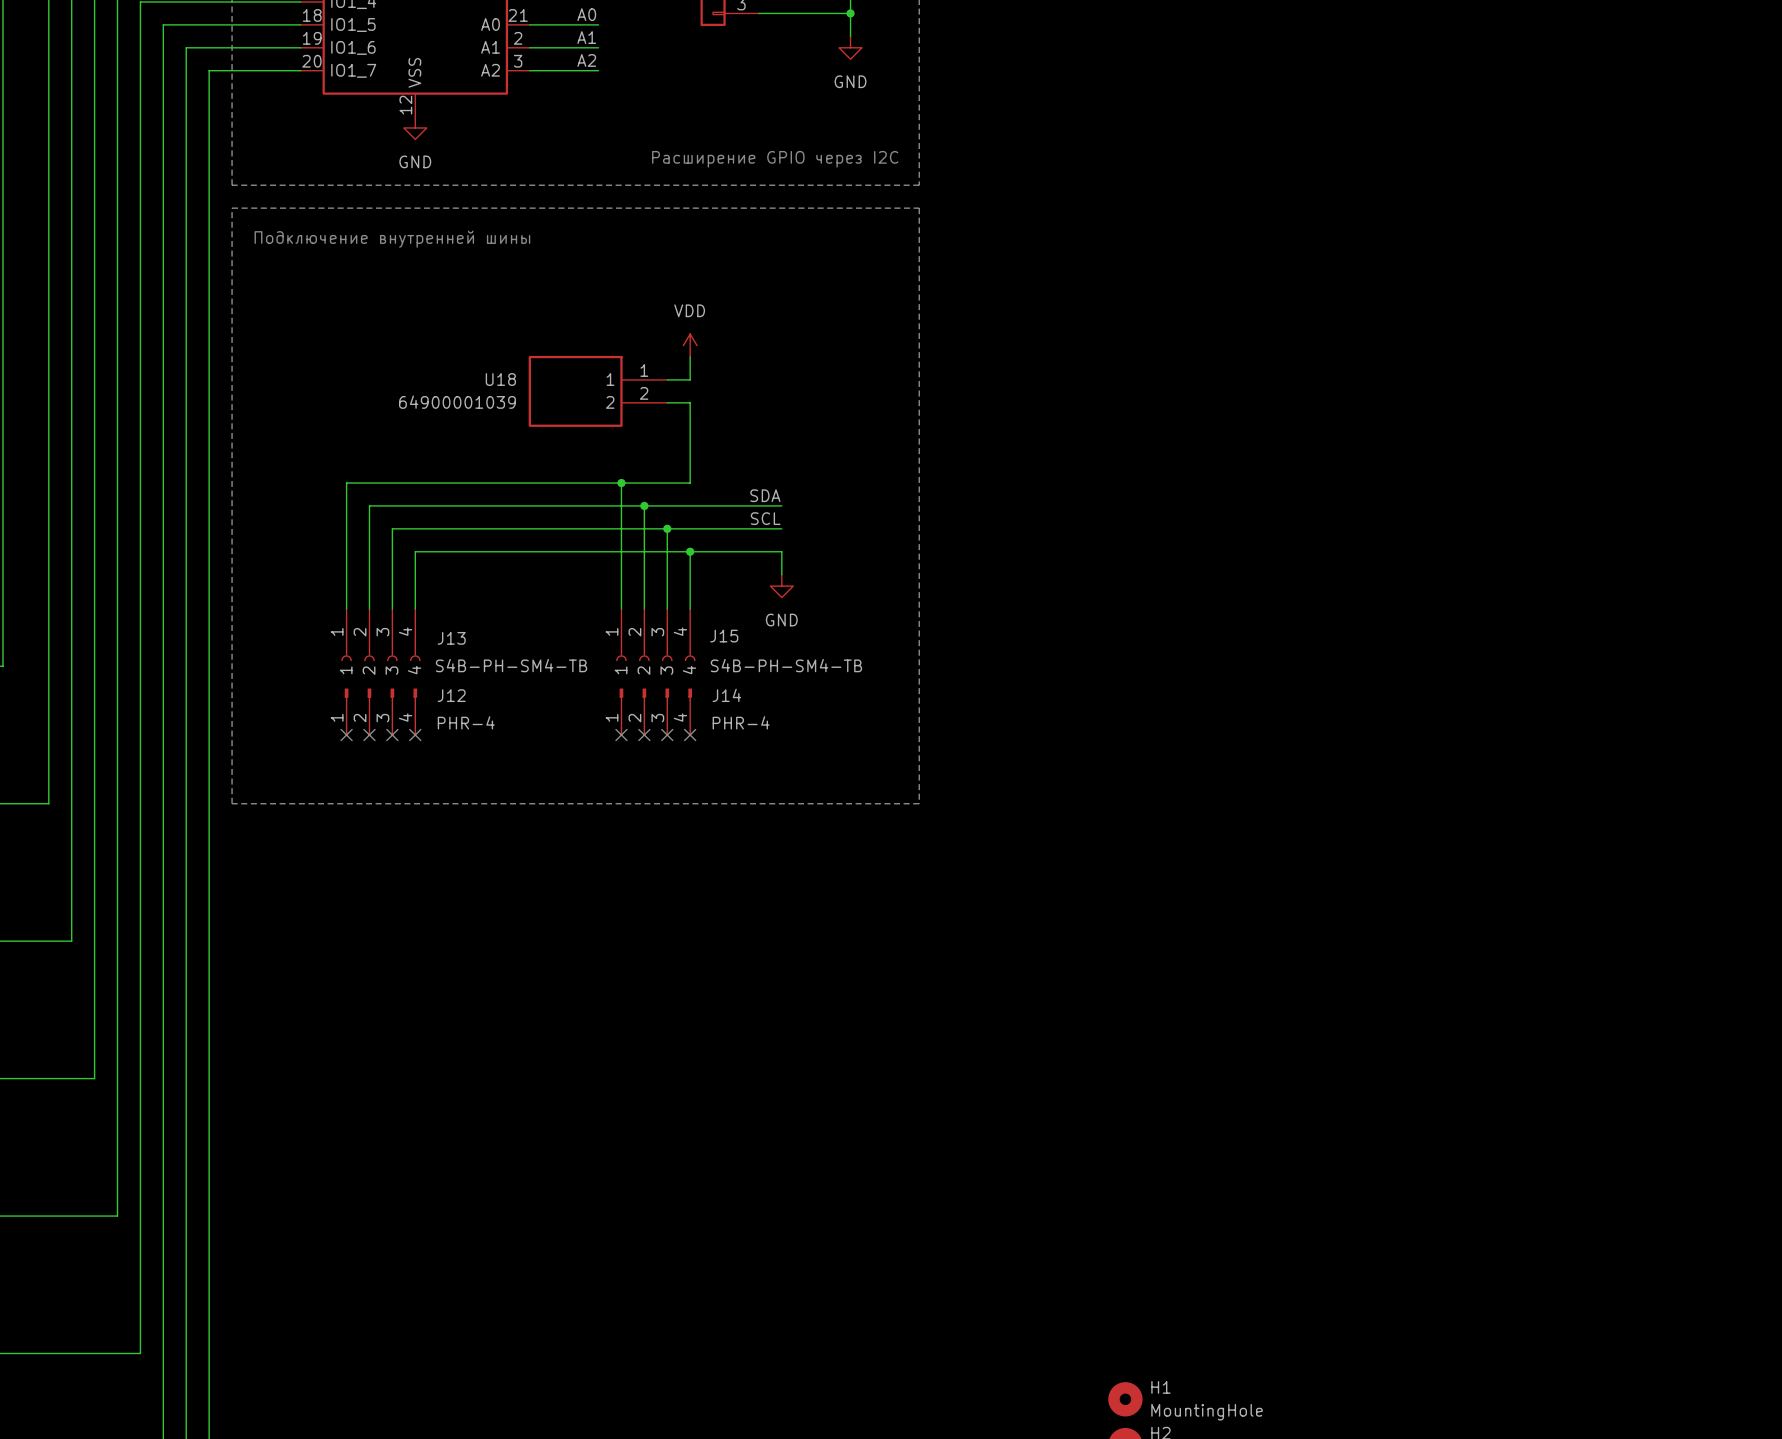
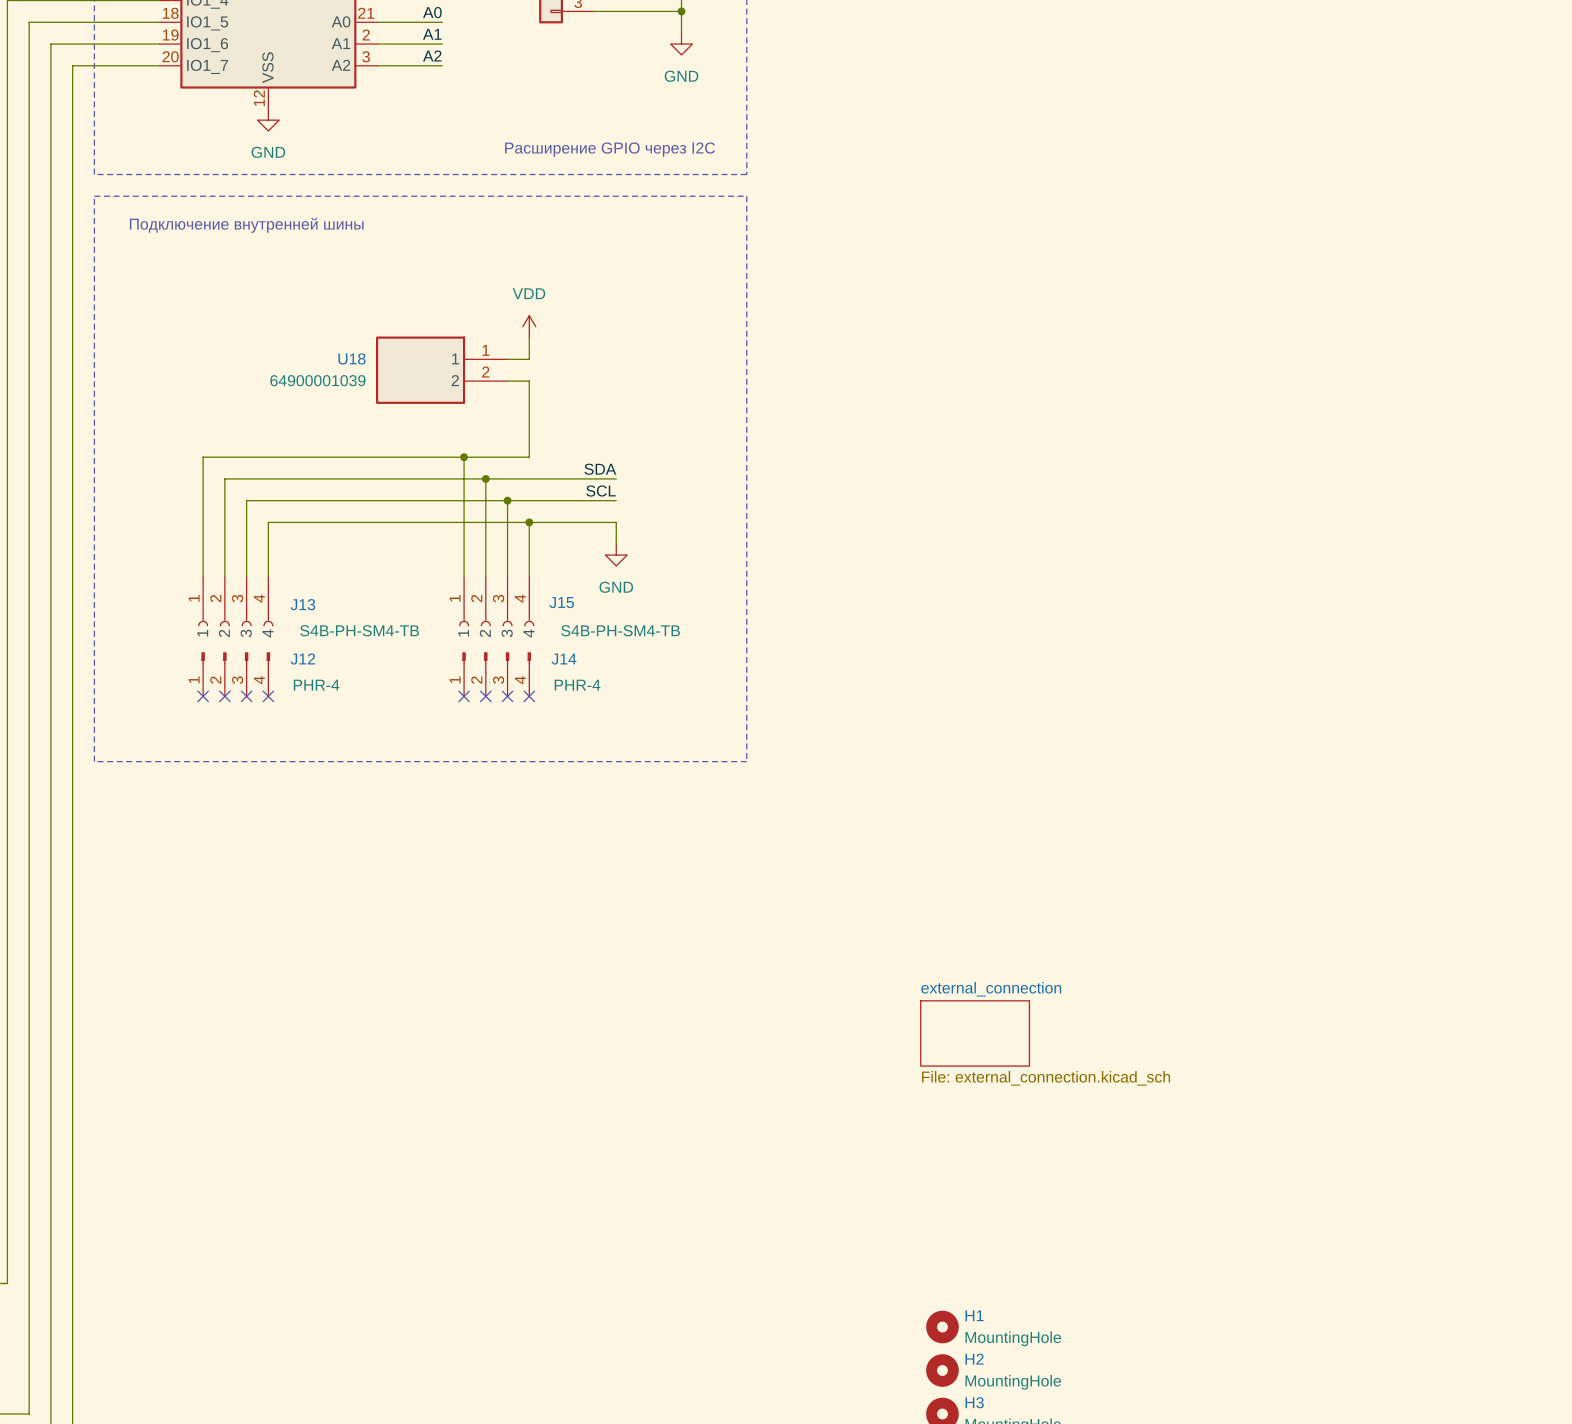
sheet external_connection: none -> File: external_connection.kicad_sch (975, 1033)

